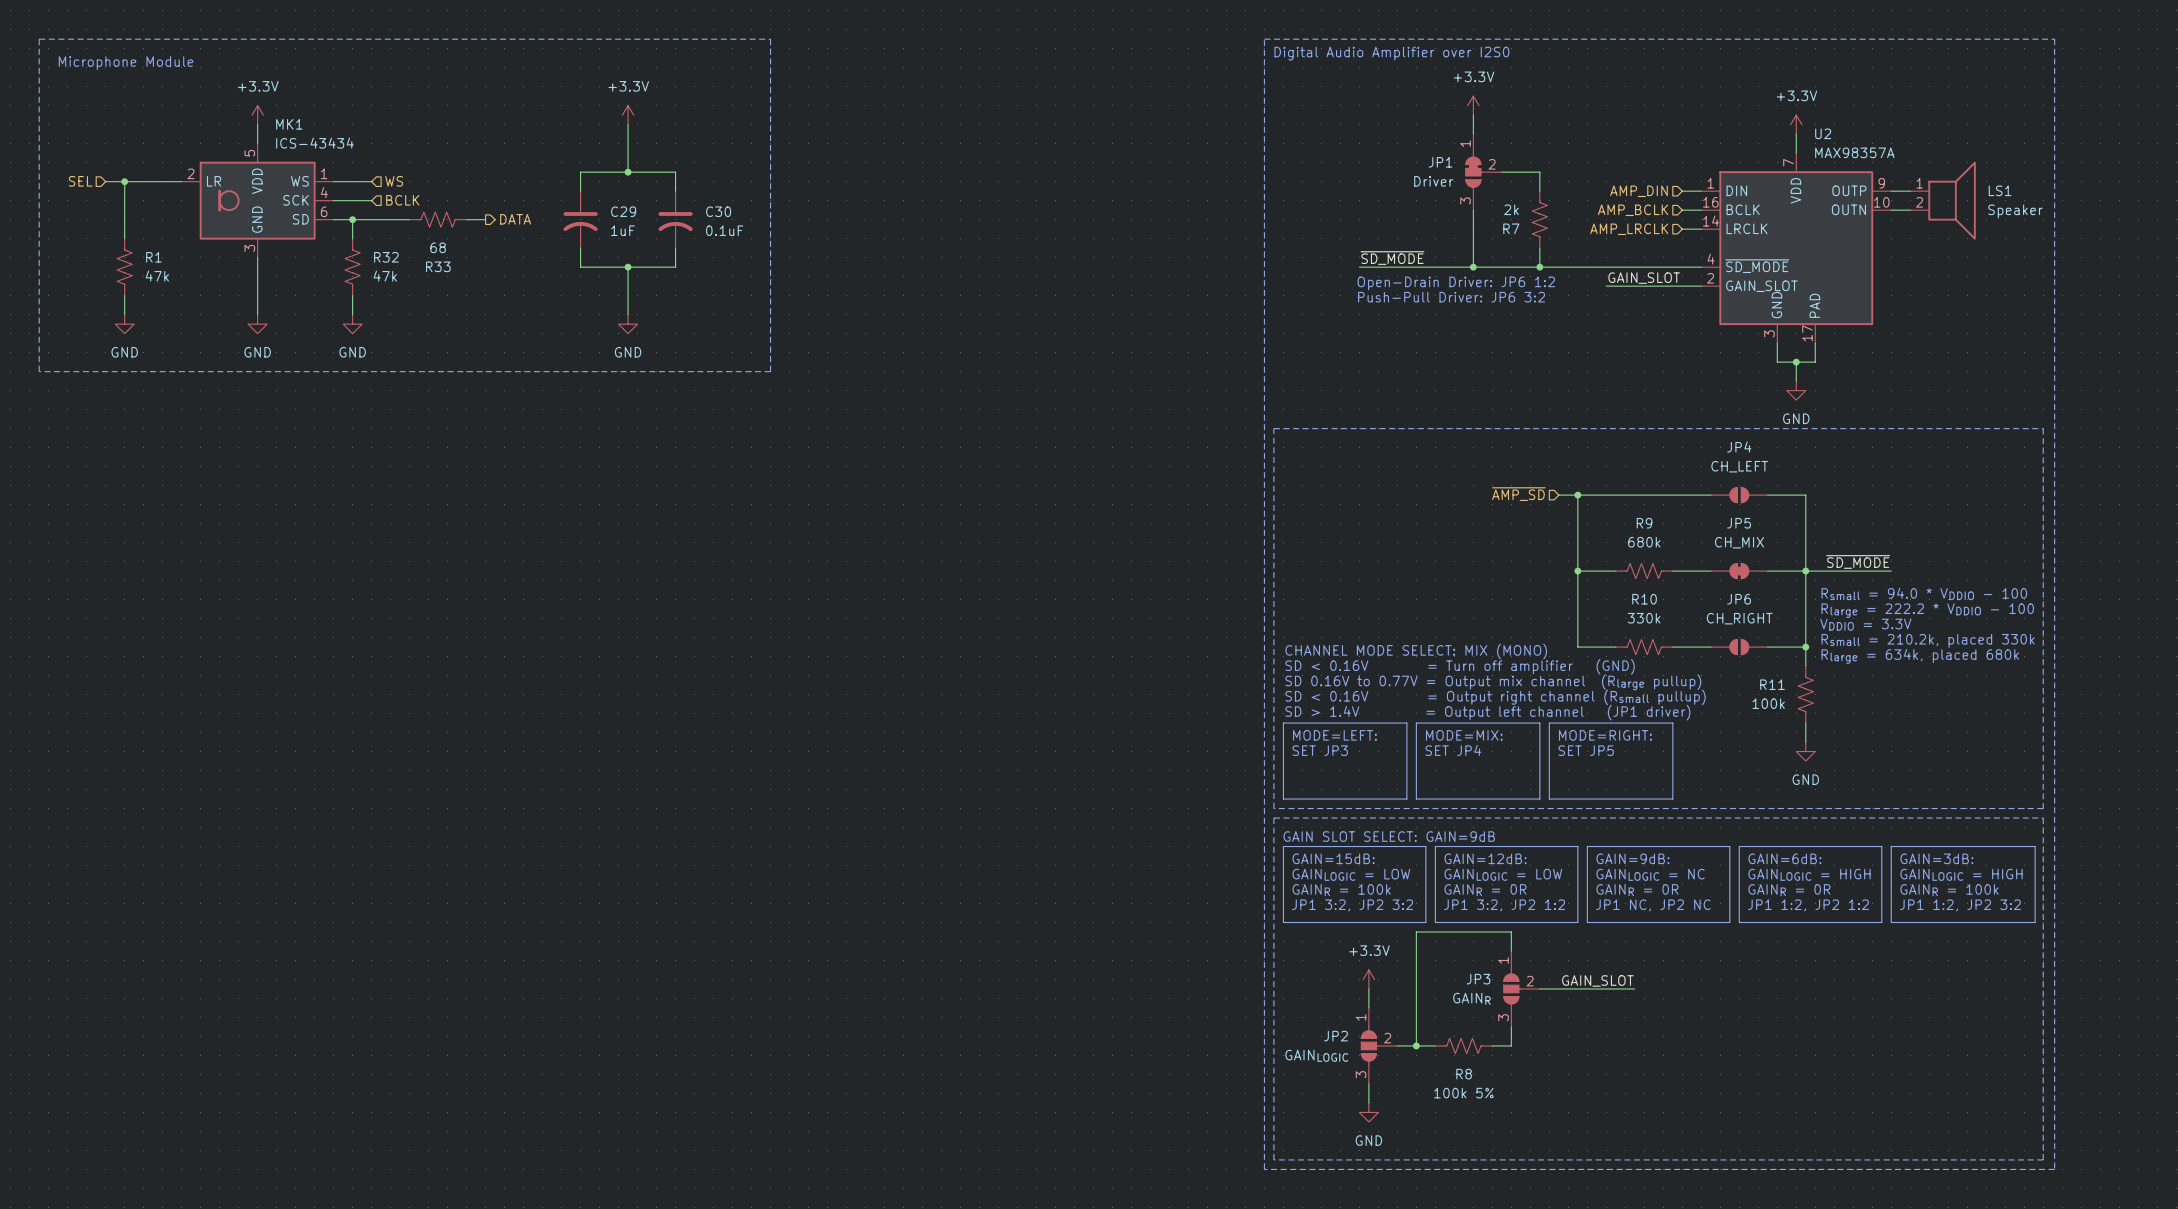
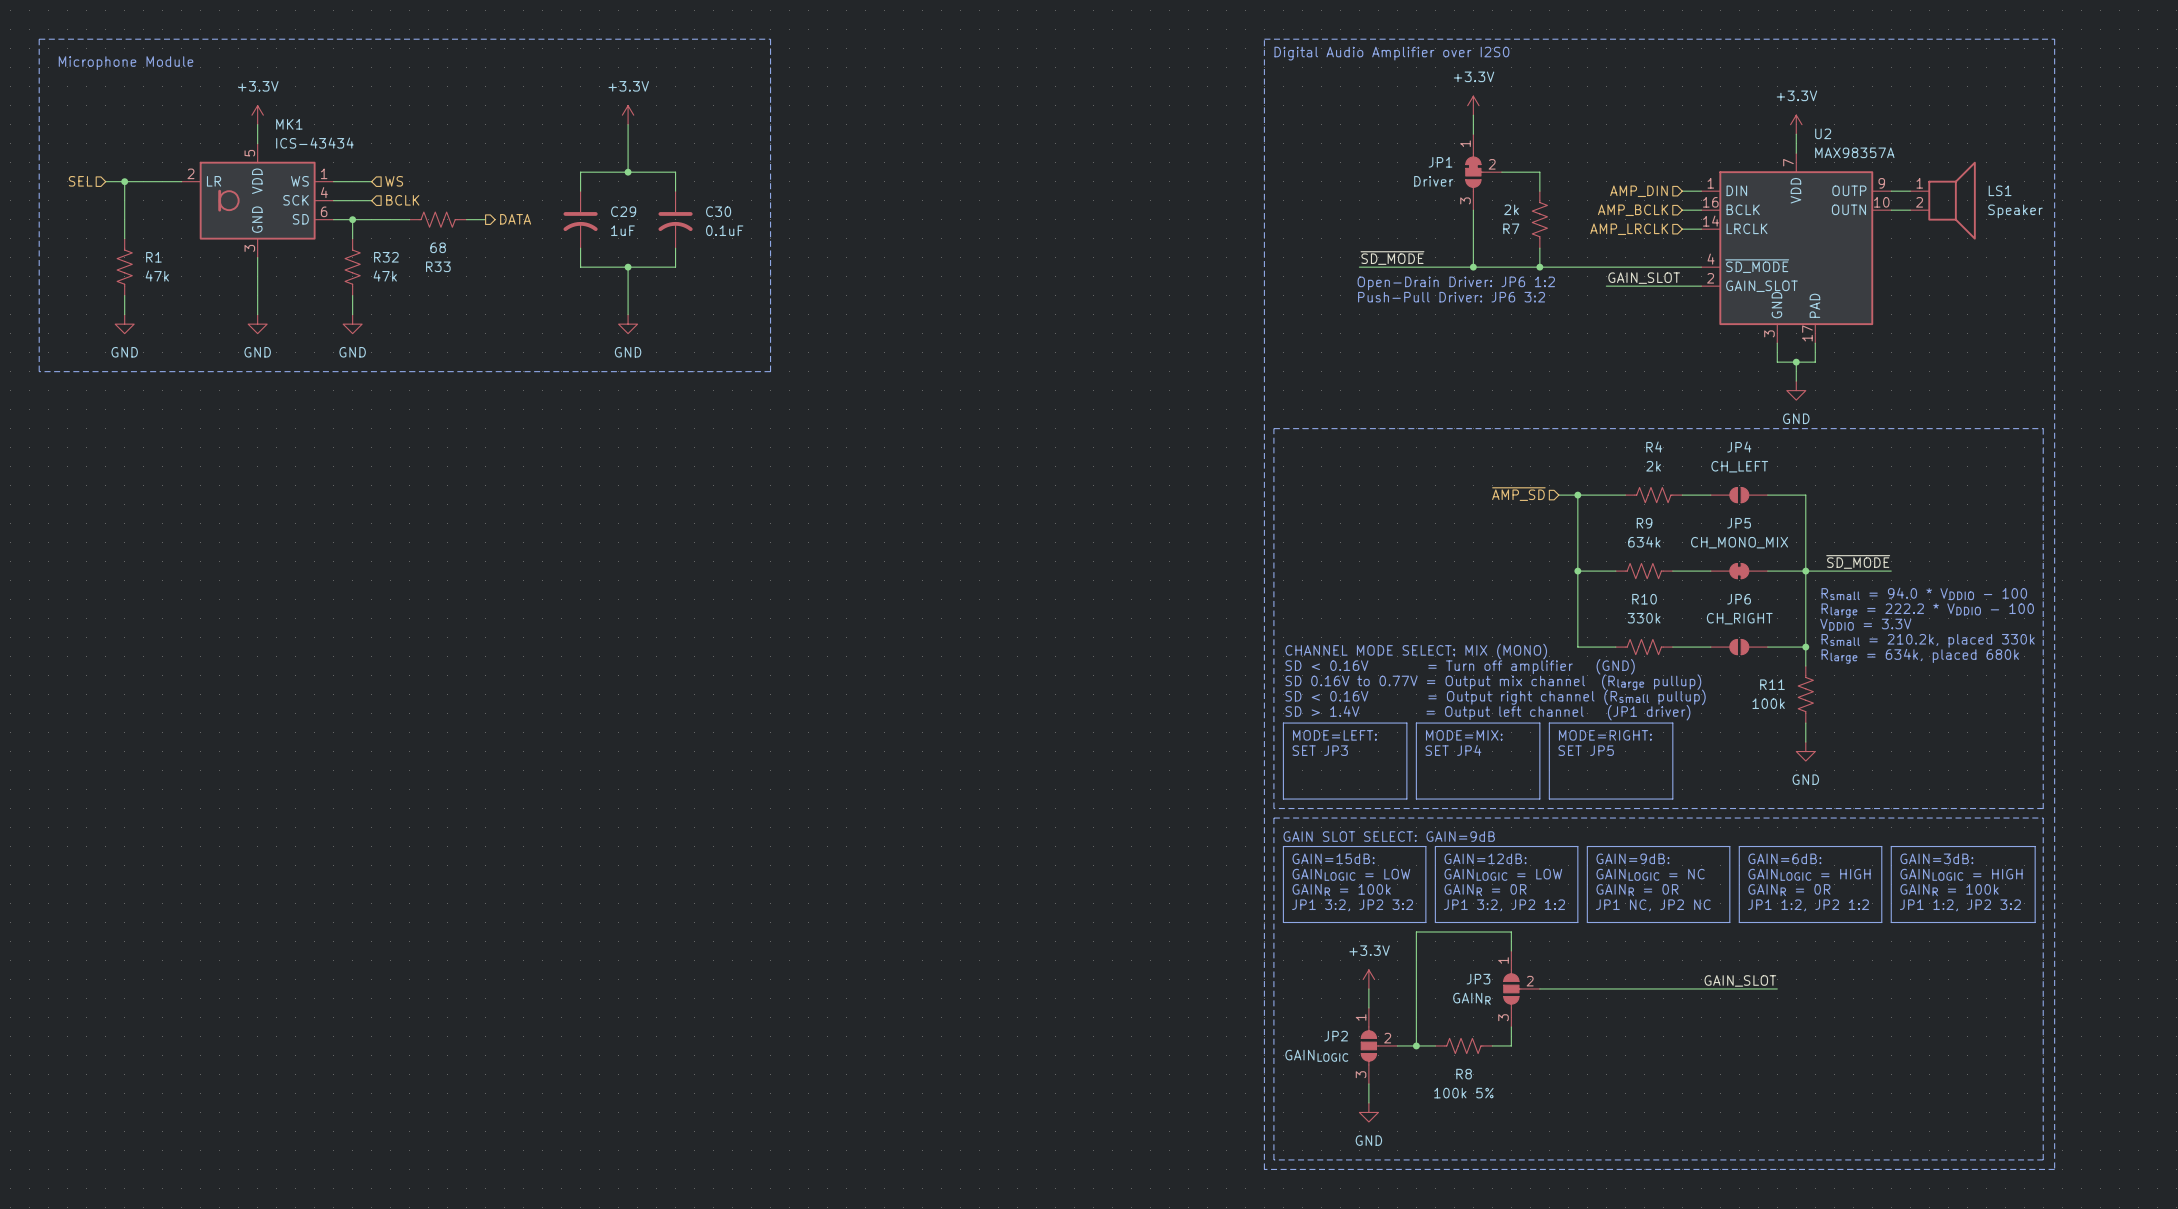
R4: none -> 2k (1653, 495)
R9 value: 680k (1644, 542) -> 634k (1644, 542)
JP5 value: CH_MIX (1739, 542) -> CH_MONO_MIX (1739, 542)
label position: GAIN_SLOT (1597, 980) -> GAIN_SLOT (1740, 980)
wire: none -> (1634, 988) (1777, 988)

